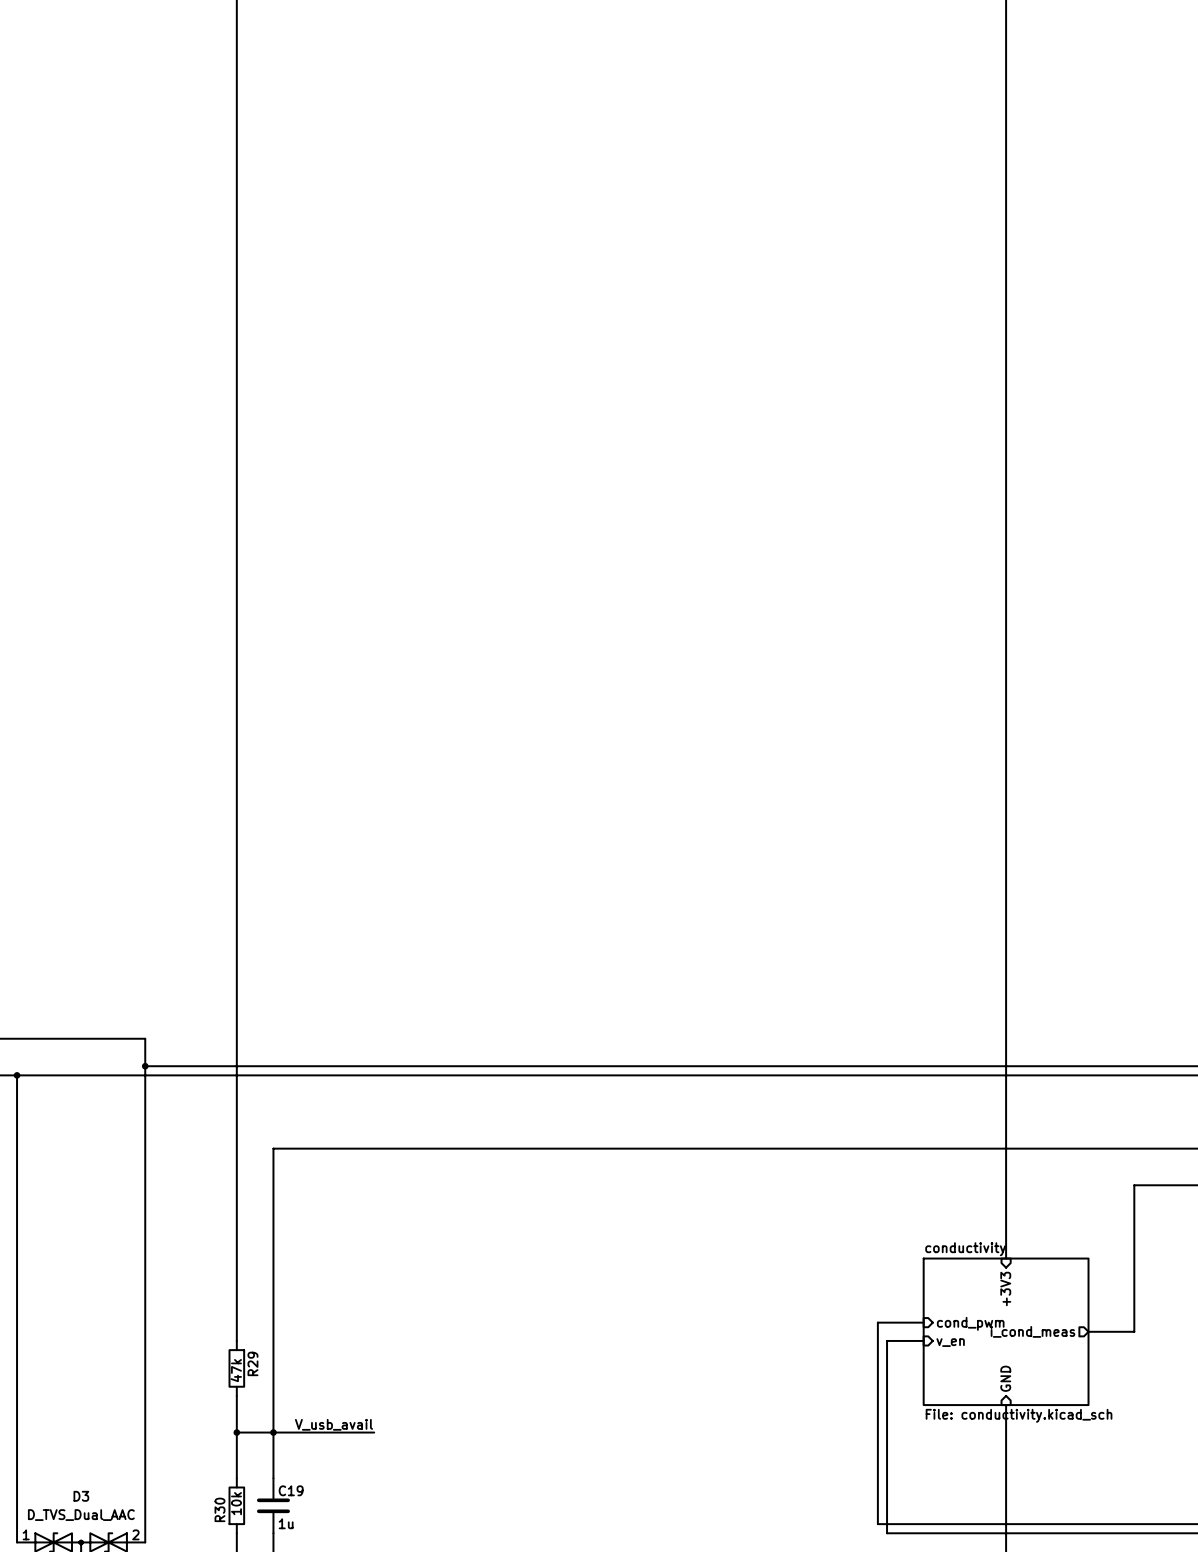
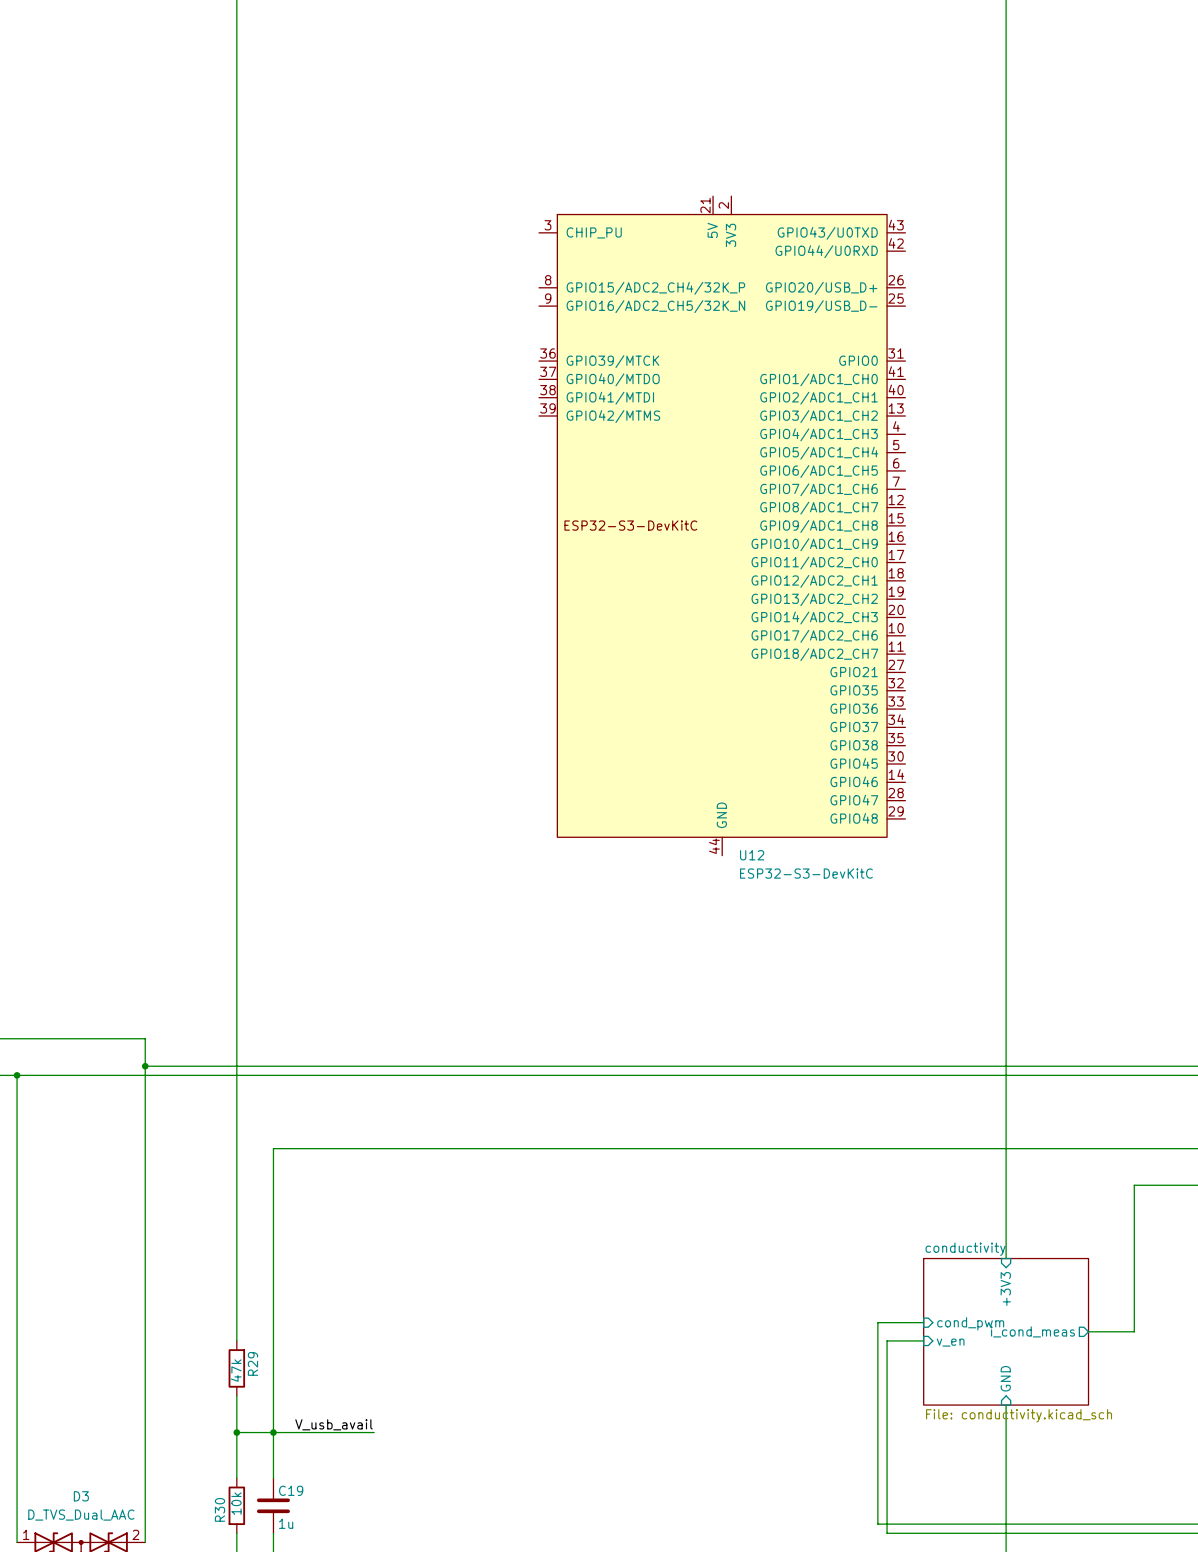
U12: none -> ESP32-S3-DevKitC (722, 525)

